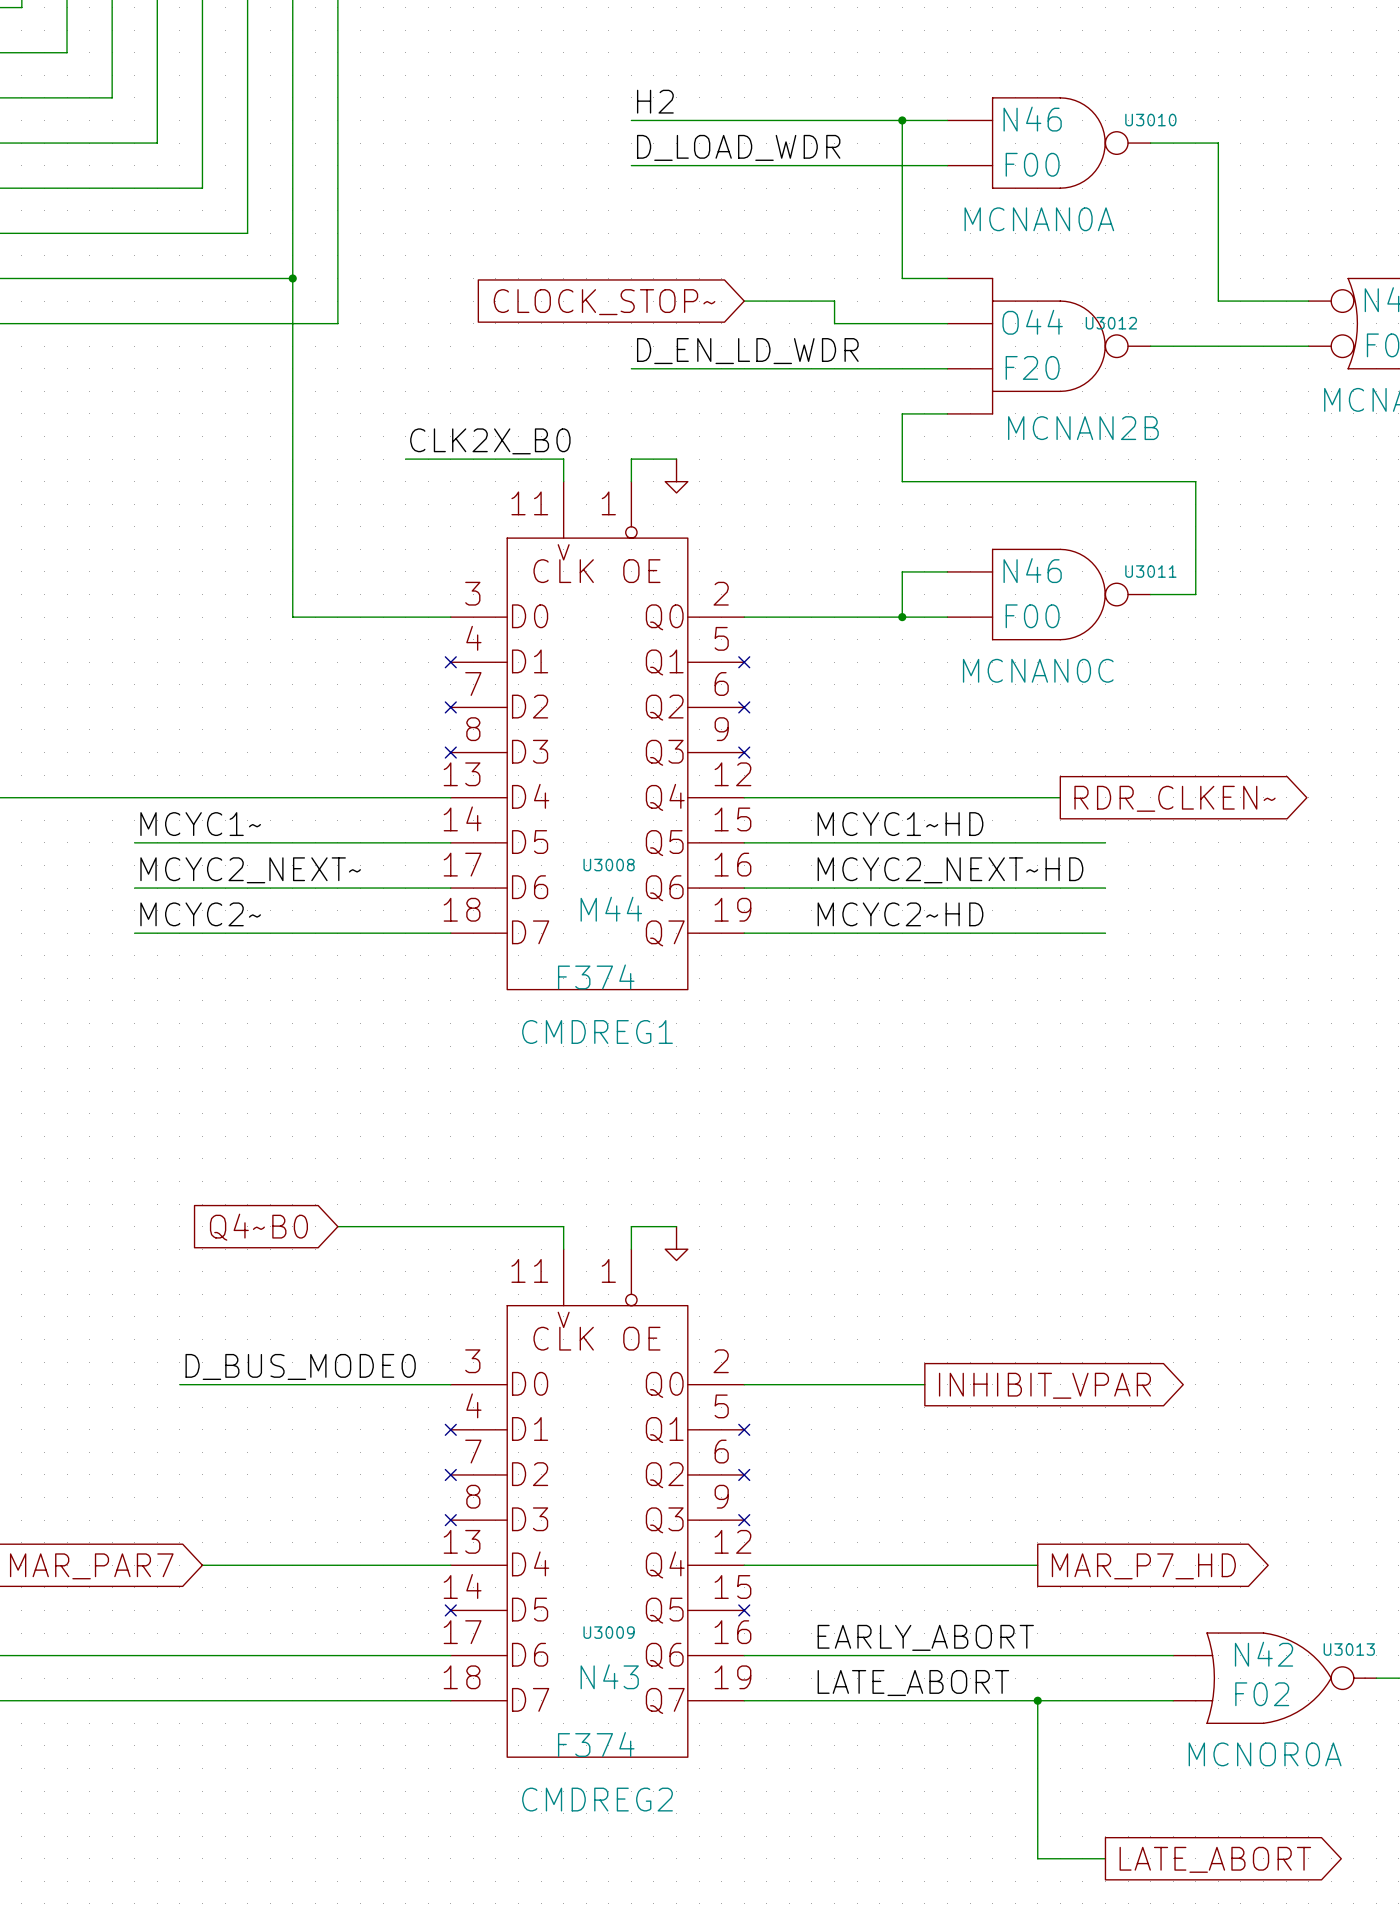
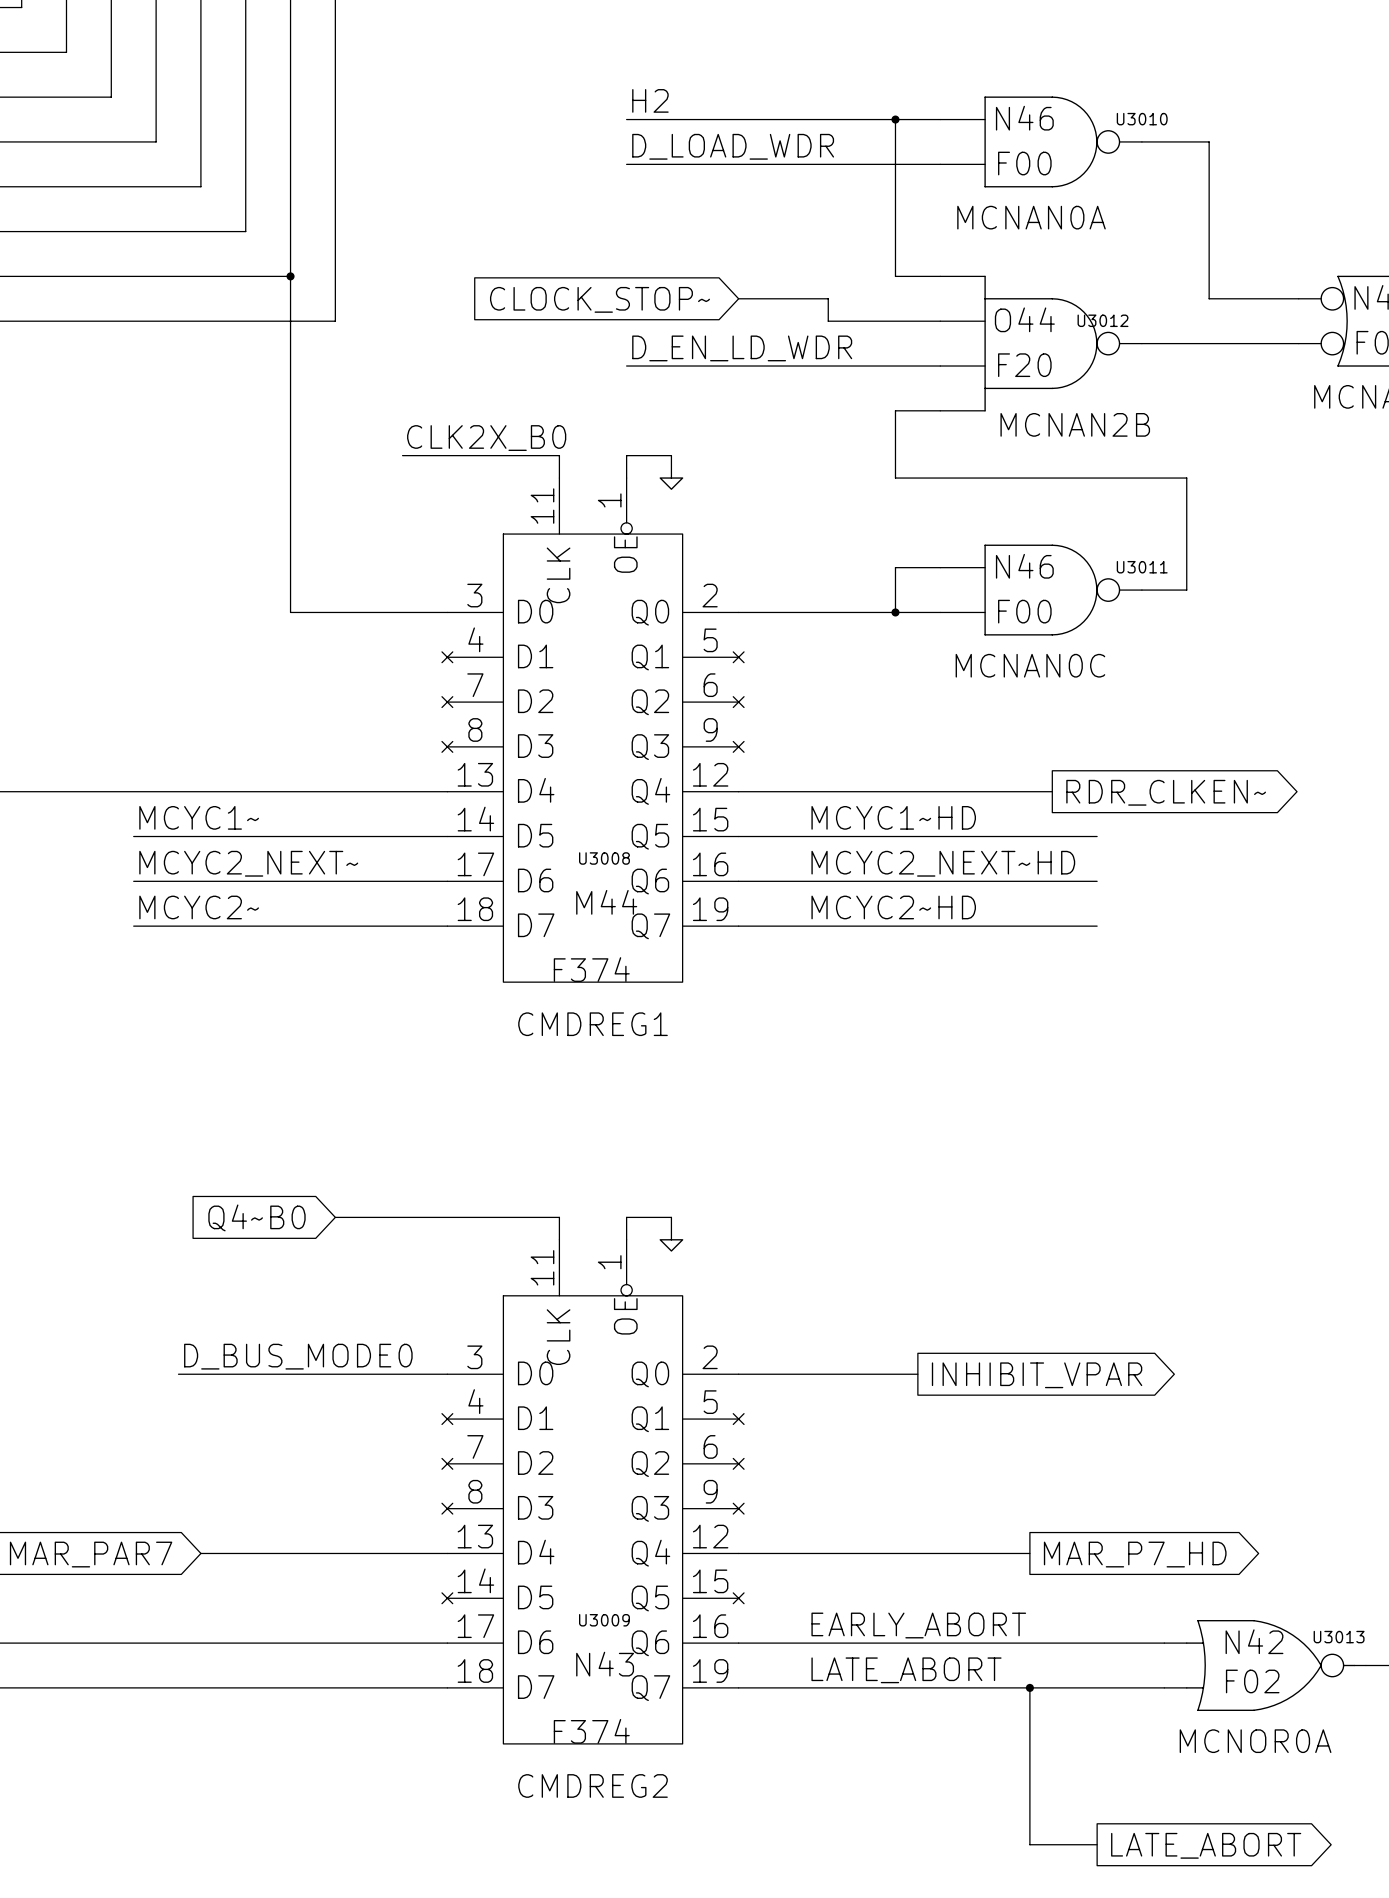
U3008 symbol: [450, 481, 745, 990] -> [447, 478, 739, 983]
U3009 symbol: [450, 1249, 745, 1758] -> [447, 1239, 739, 1744]

